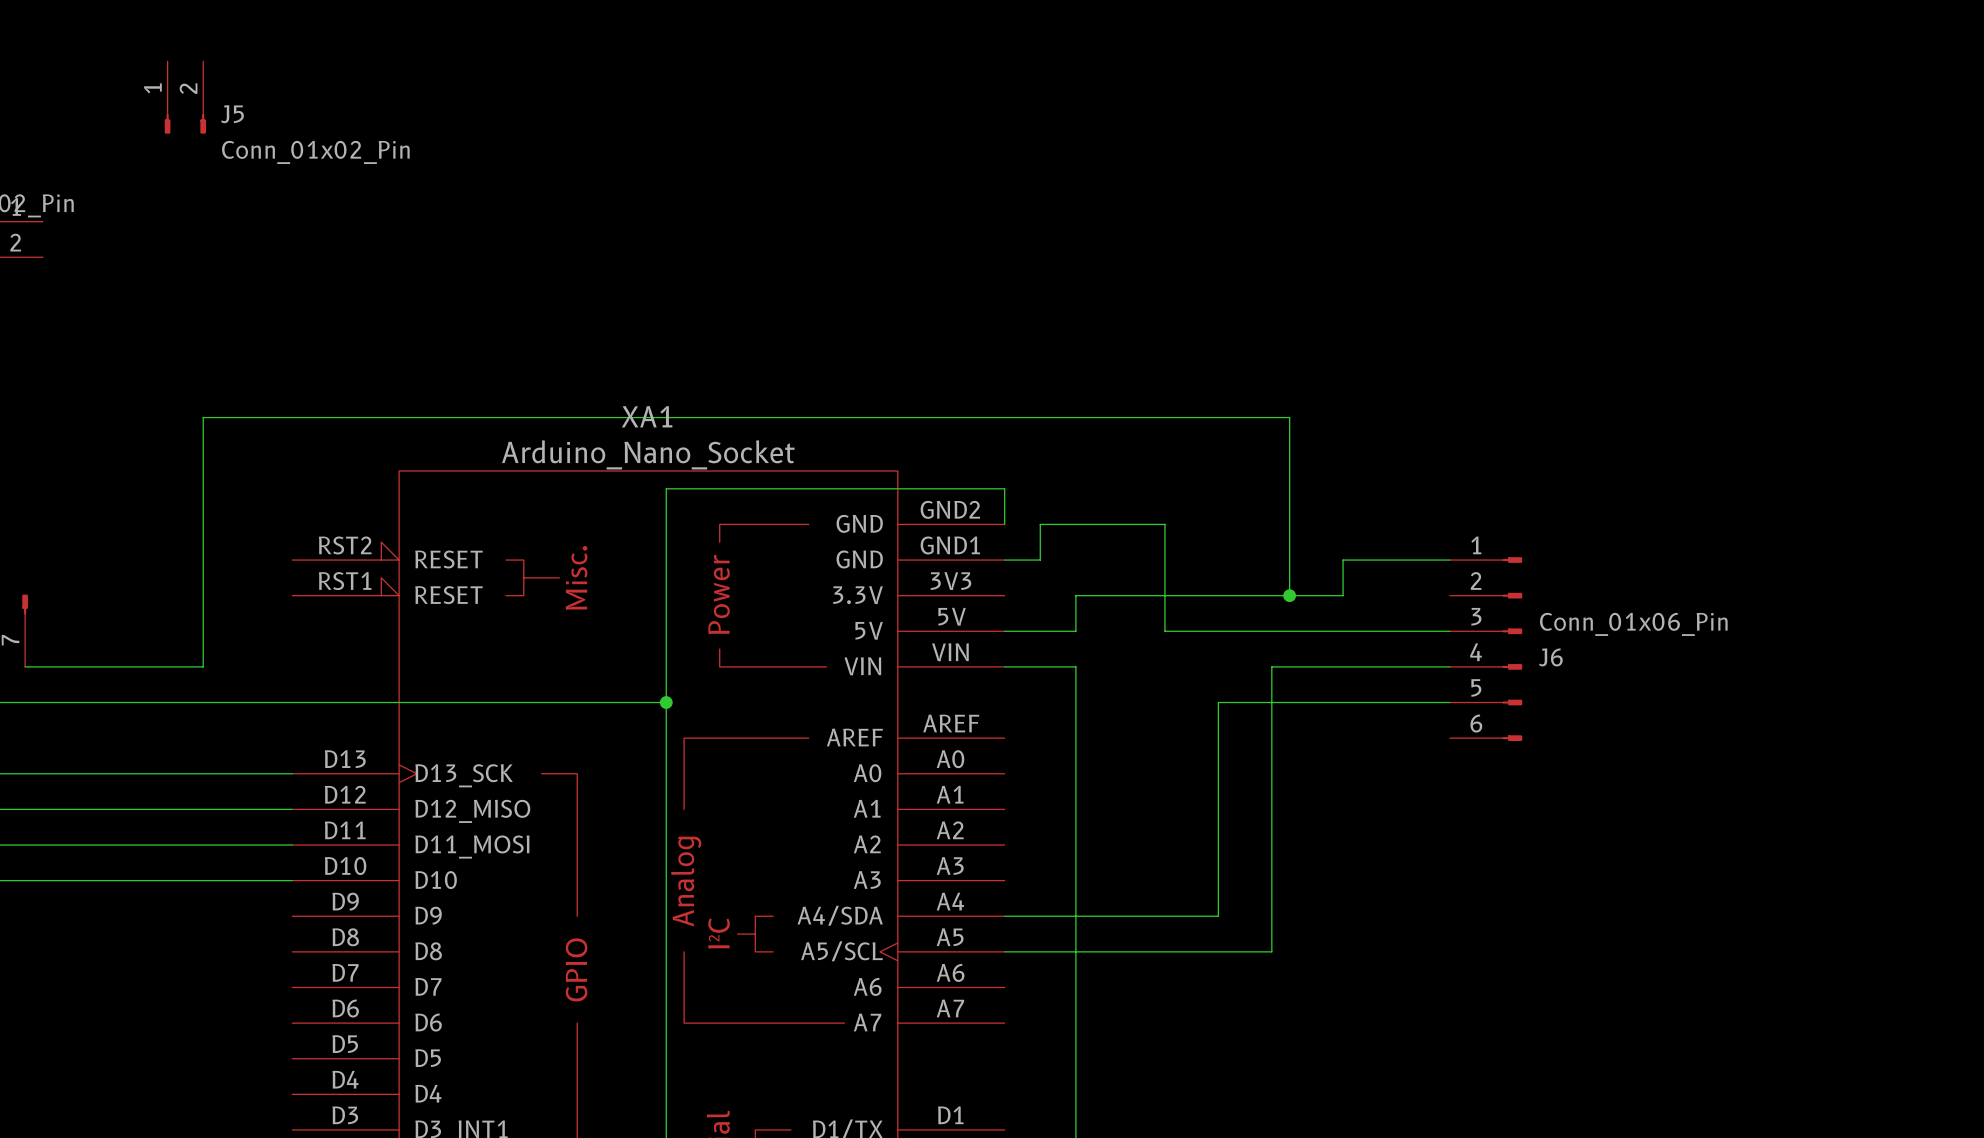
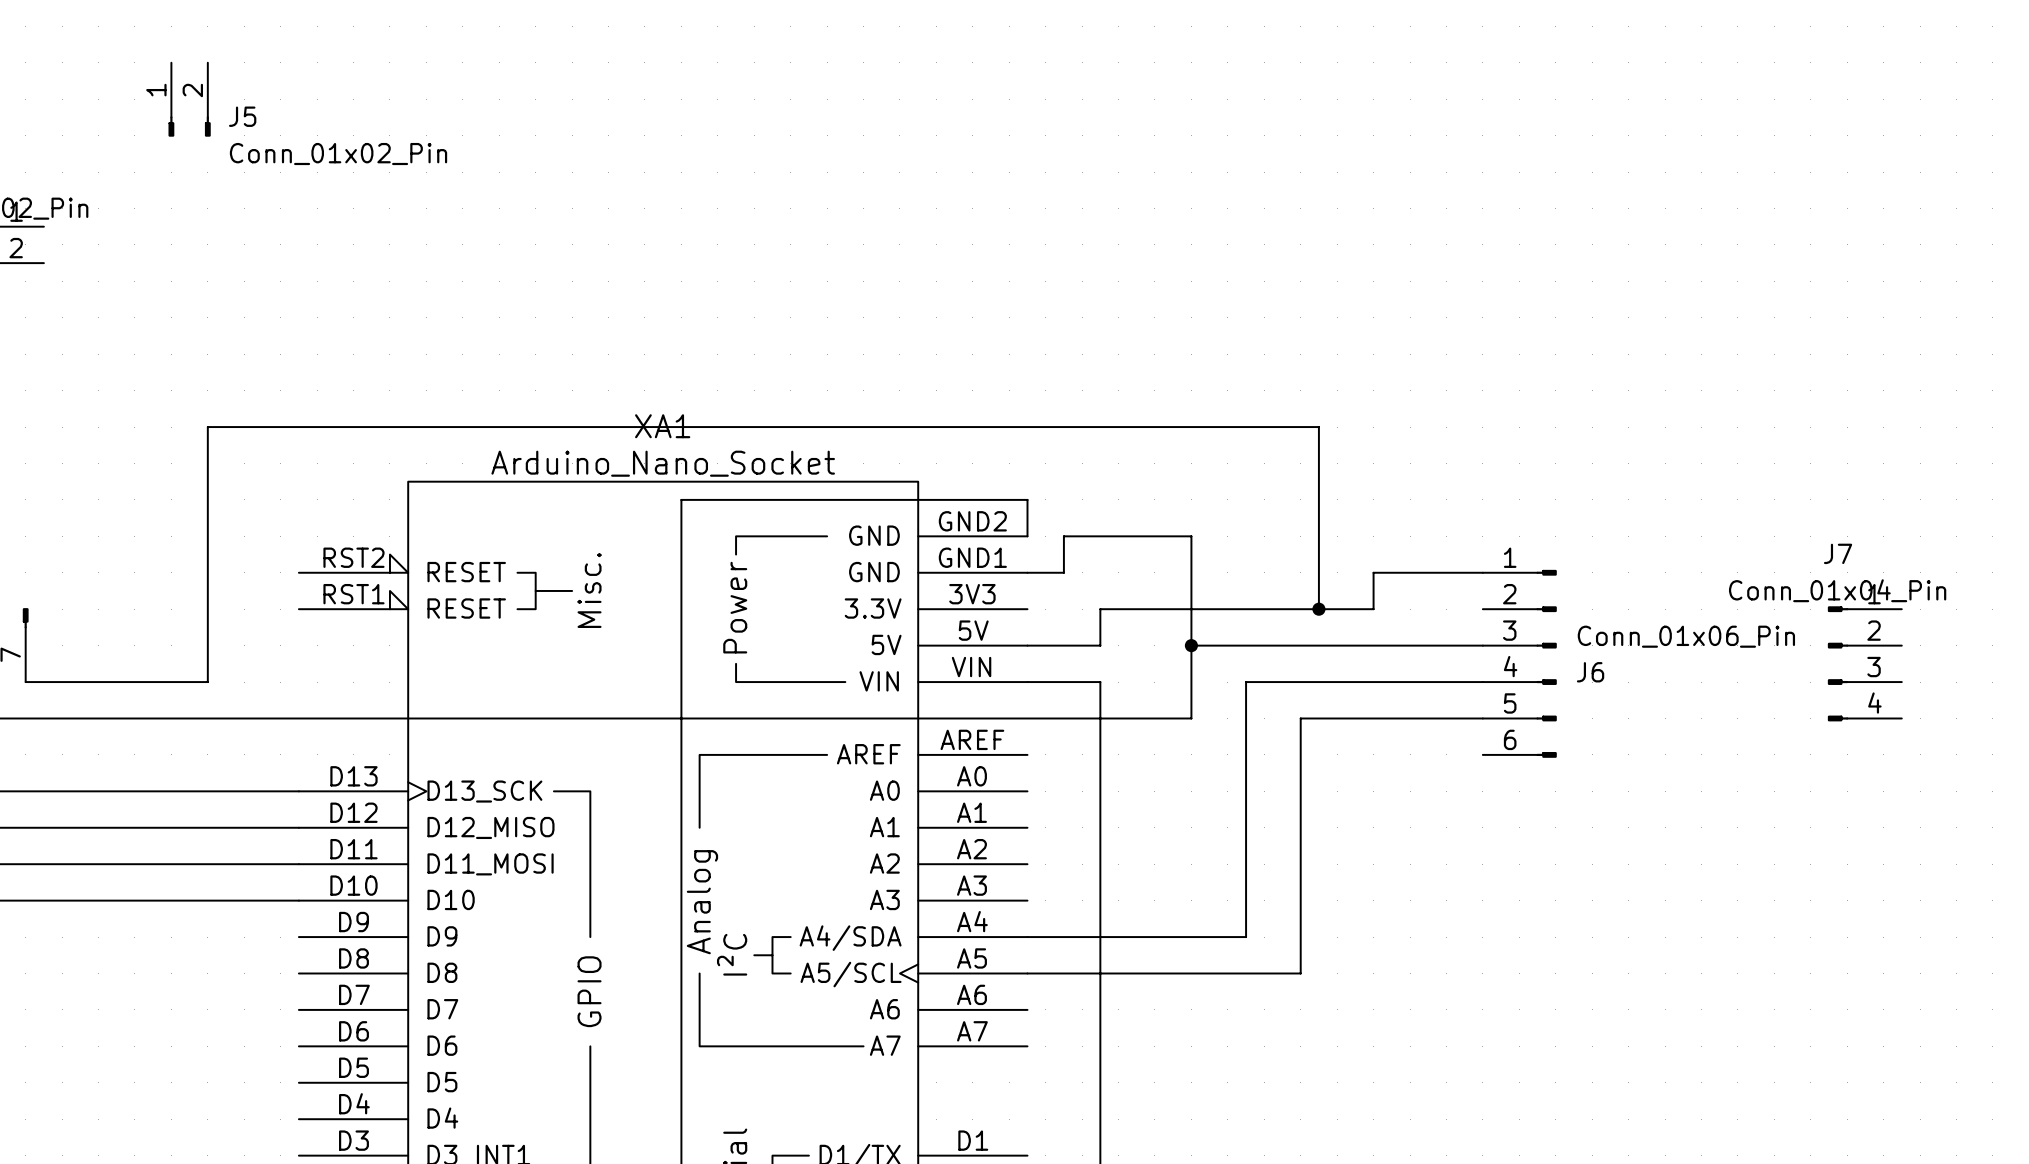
wire: none -> (1191, 645) (1191, 718) (681, 718)
junction: none -> (1191, 645)
J7: none -> Conn_01x04_Pin (1864, 663)
wire: (1271, 666) (1271, 702) (1218, 702) -> (1300, 682) (1246, 682) (1246, 718)
junction: (666, 702) -> none

